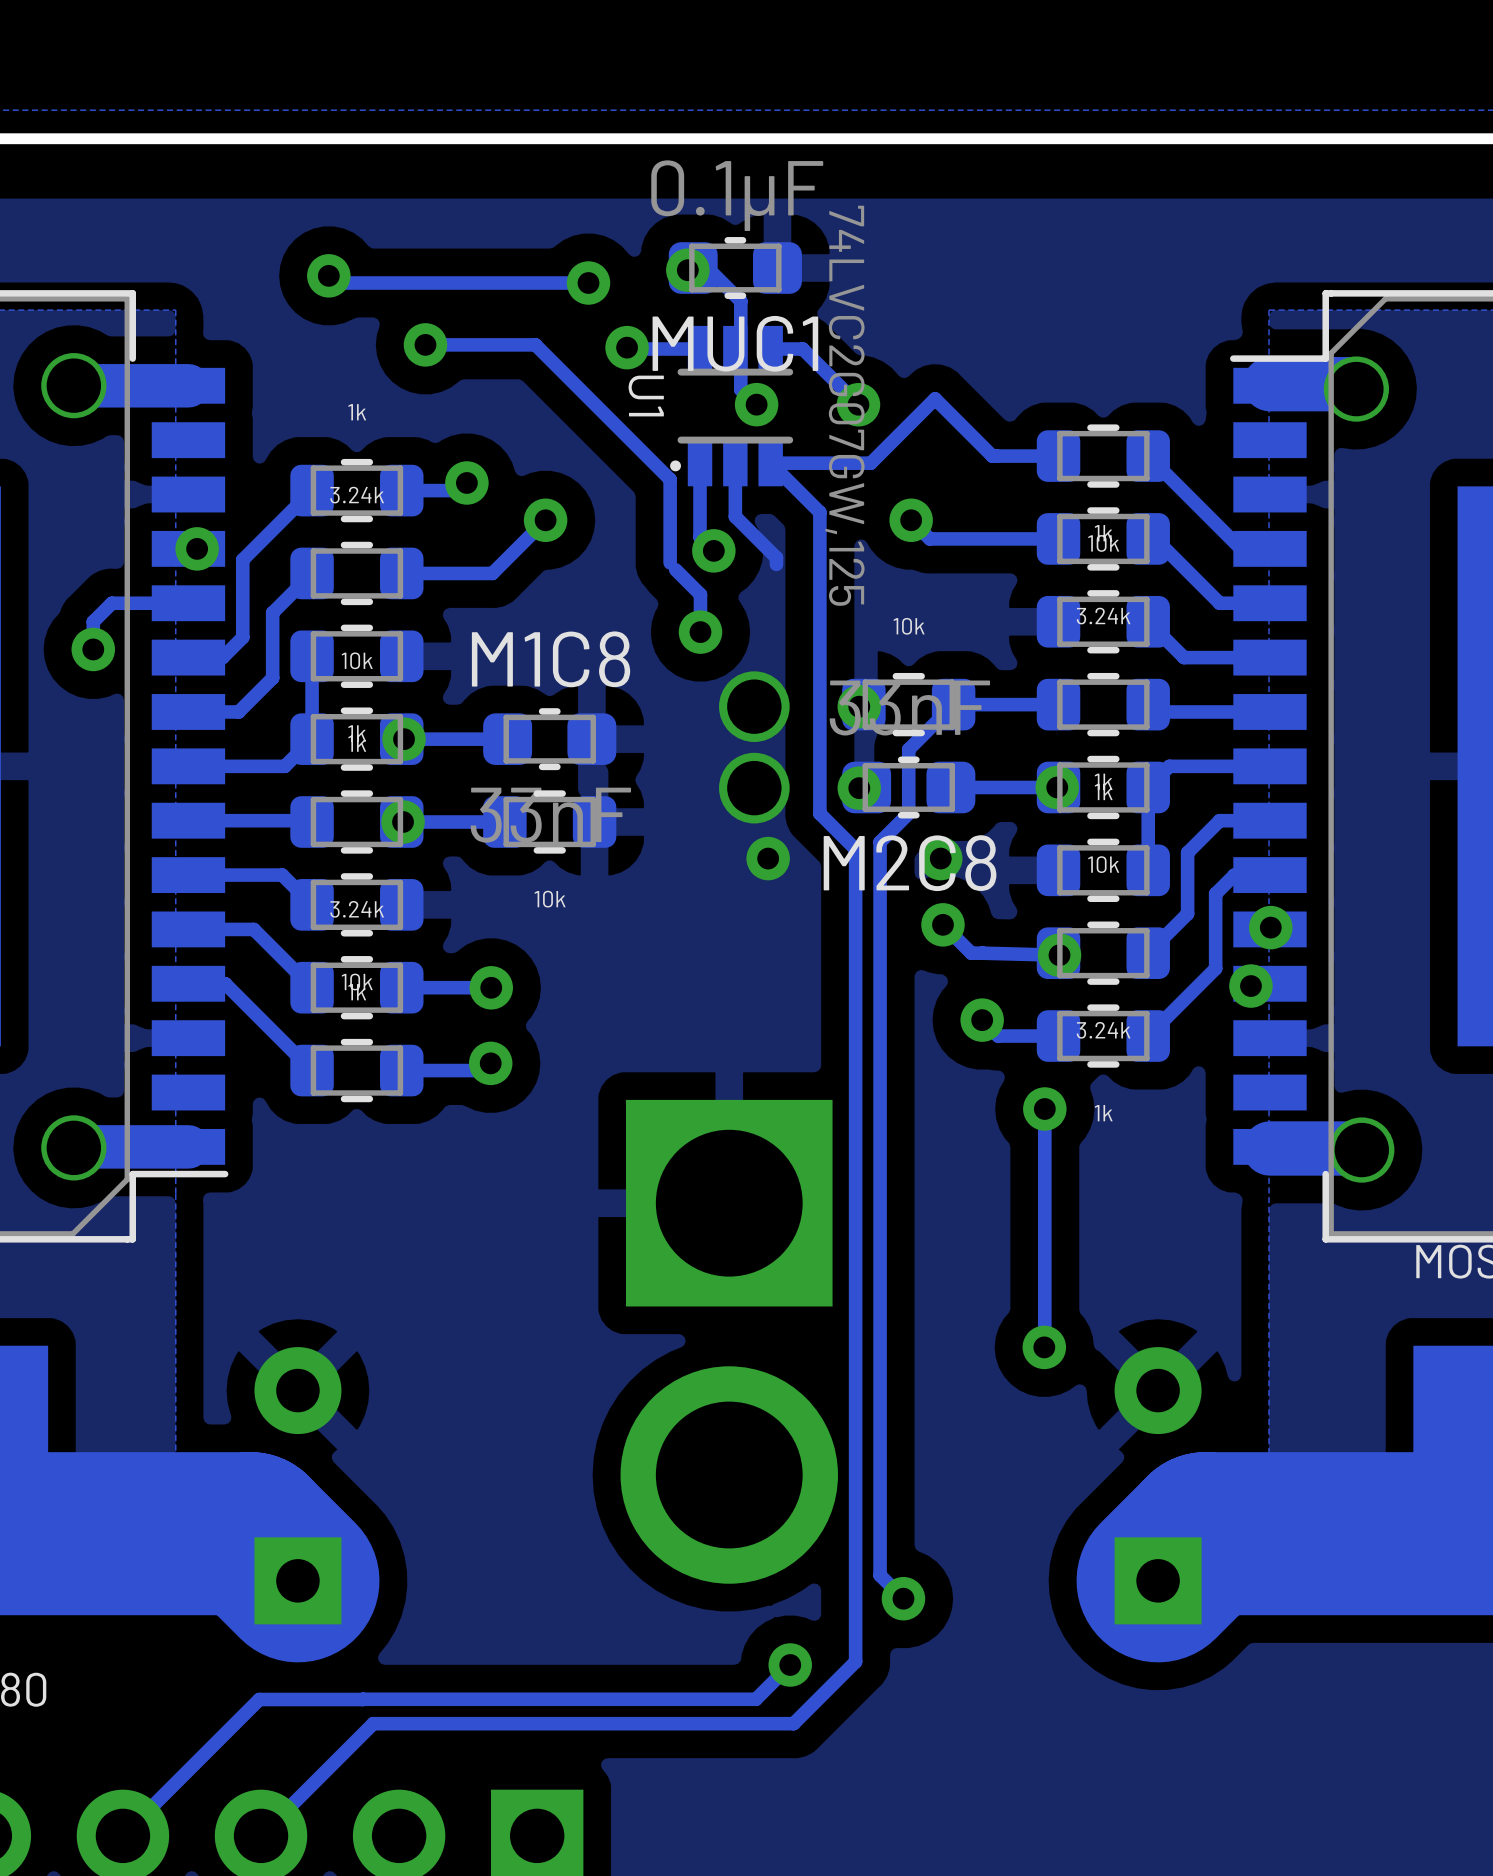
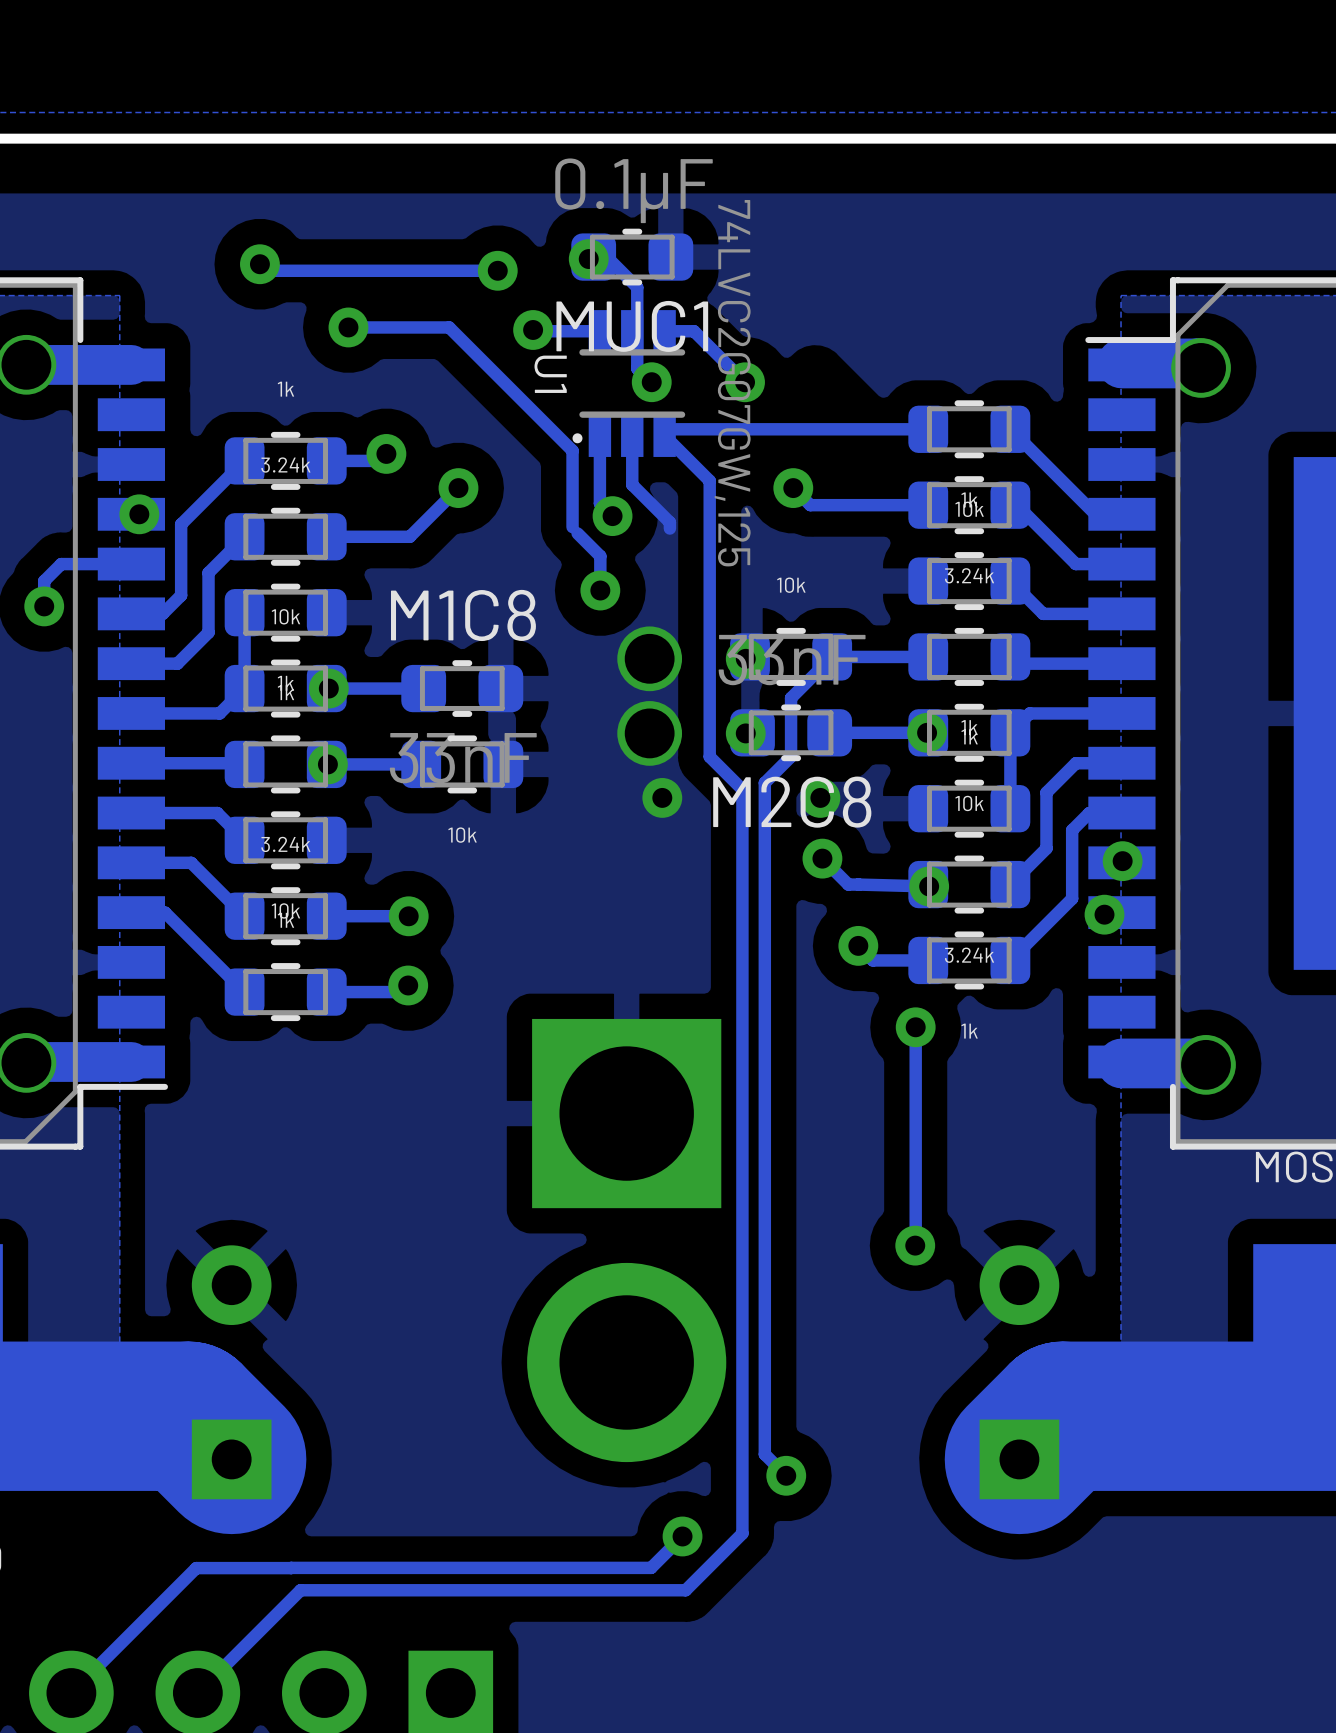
track: (992, 456) (935, 398) (870, 463) (770, 463) -> (867, 429) (671, 429) (664, 435)

